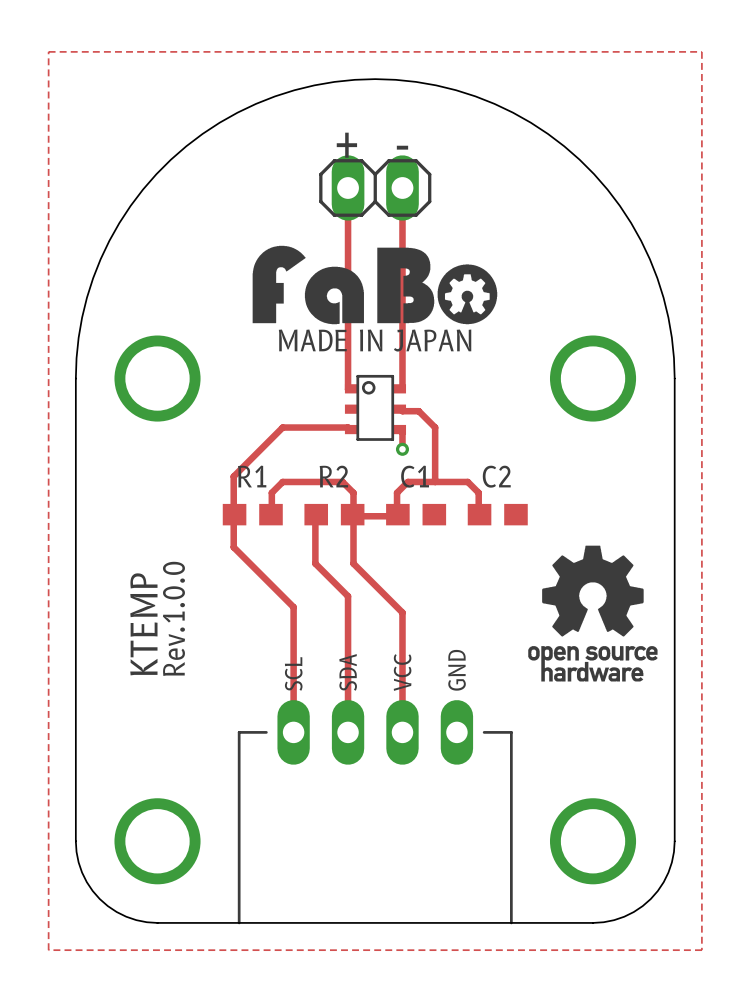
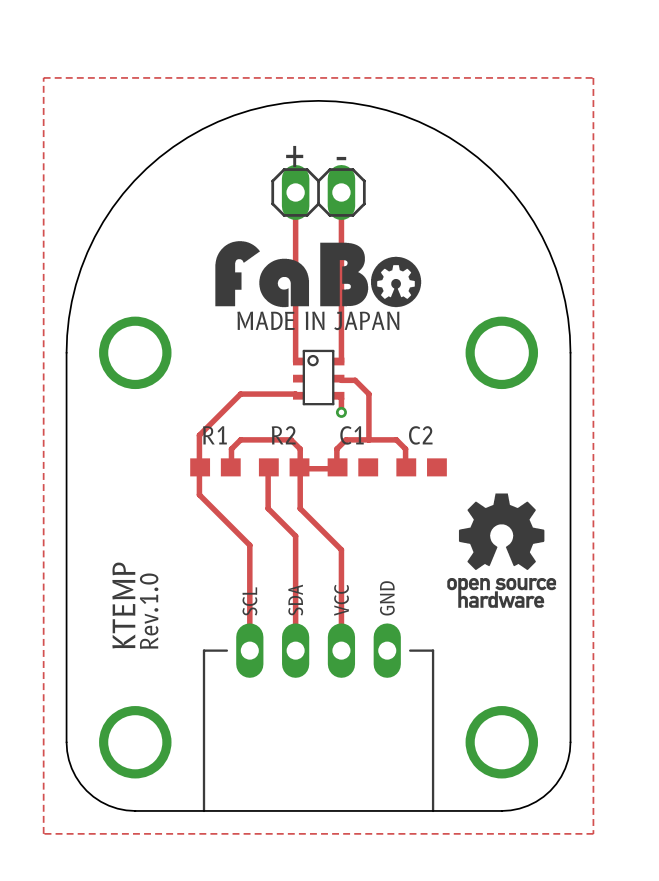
text: Rev.1.0.0 (173, 618) -> Rev.1.0 (149, 611)
text position: KTEMP (143, 624) -> KTEMP (123, 605)

